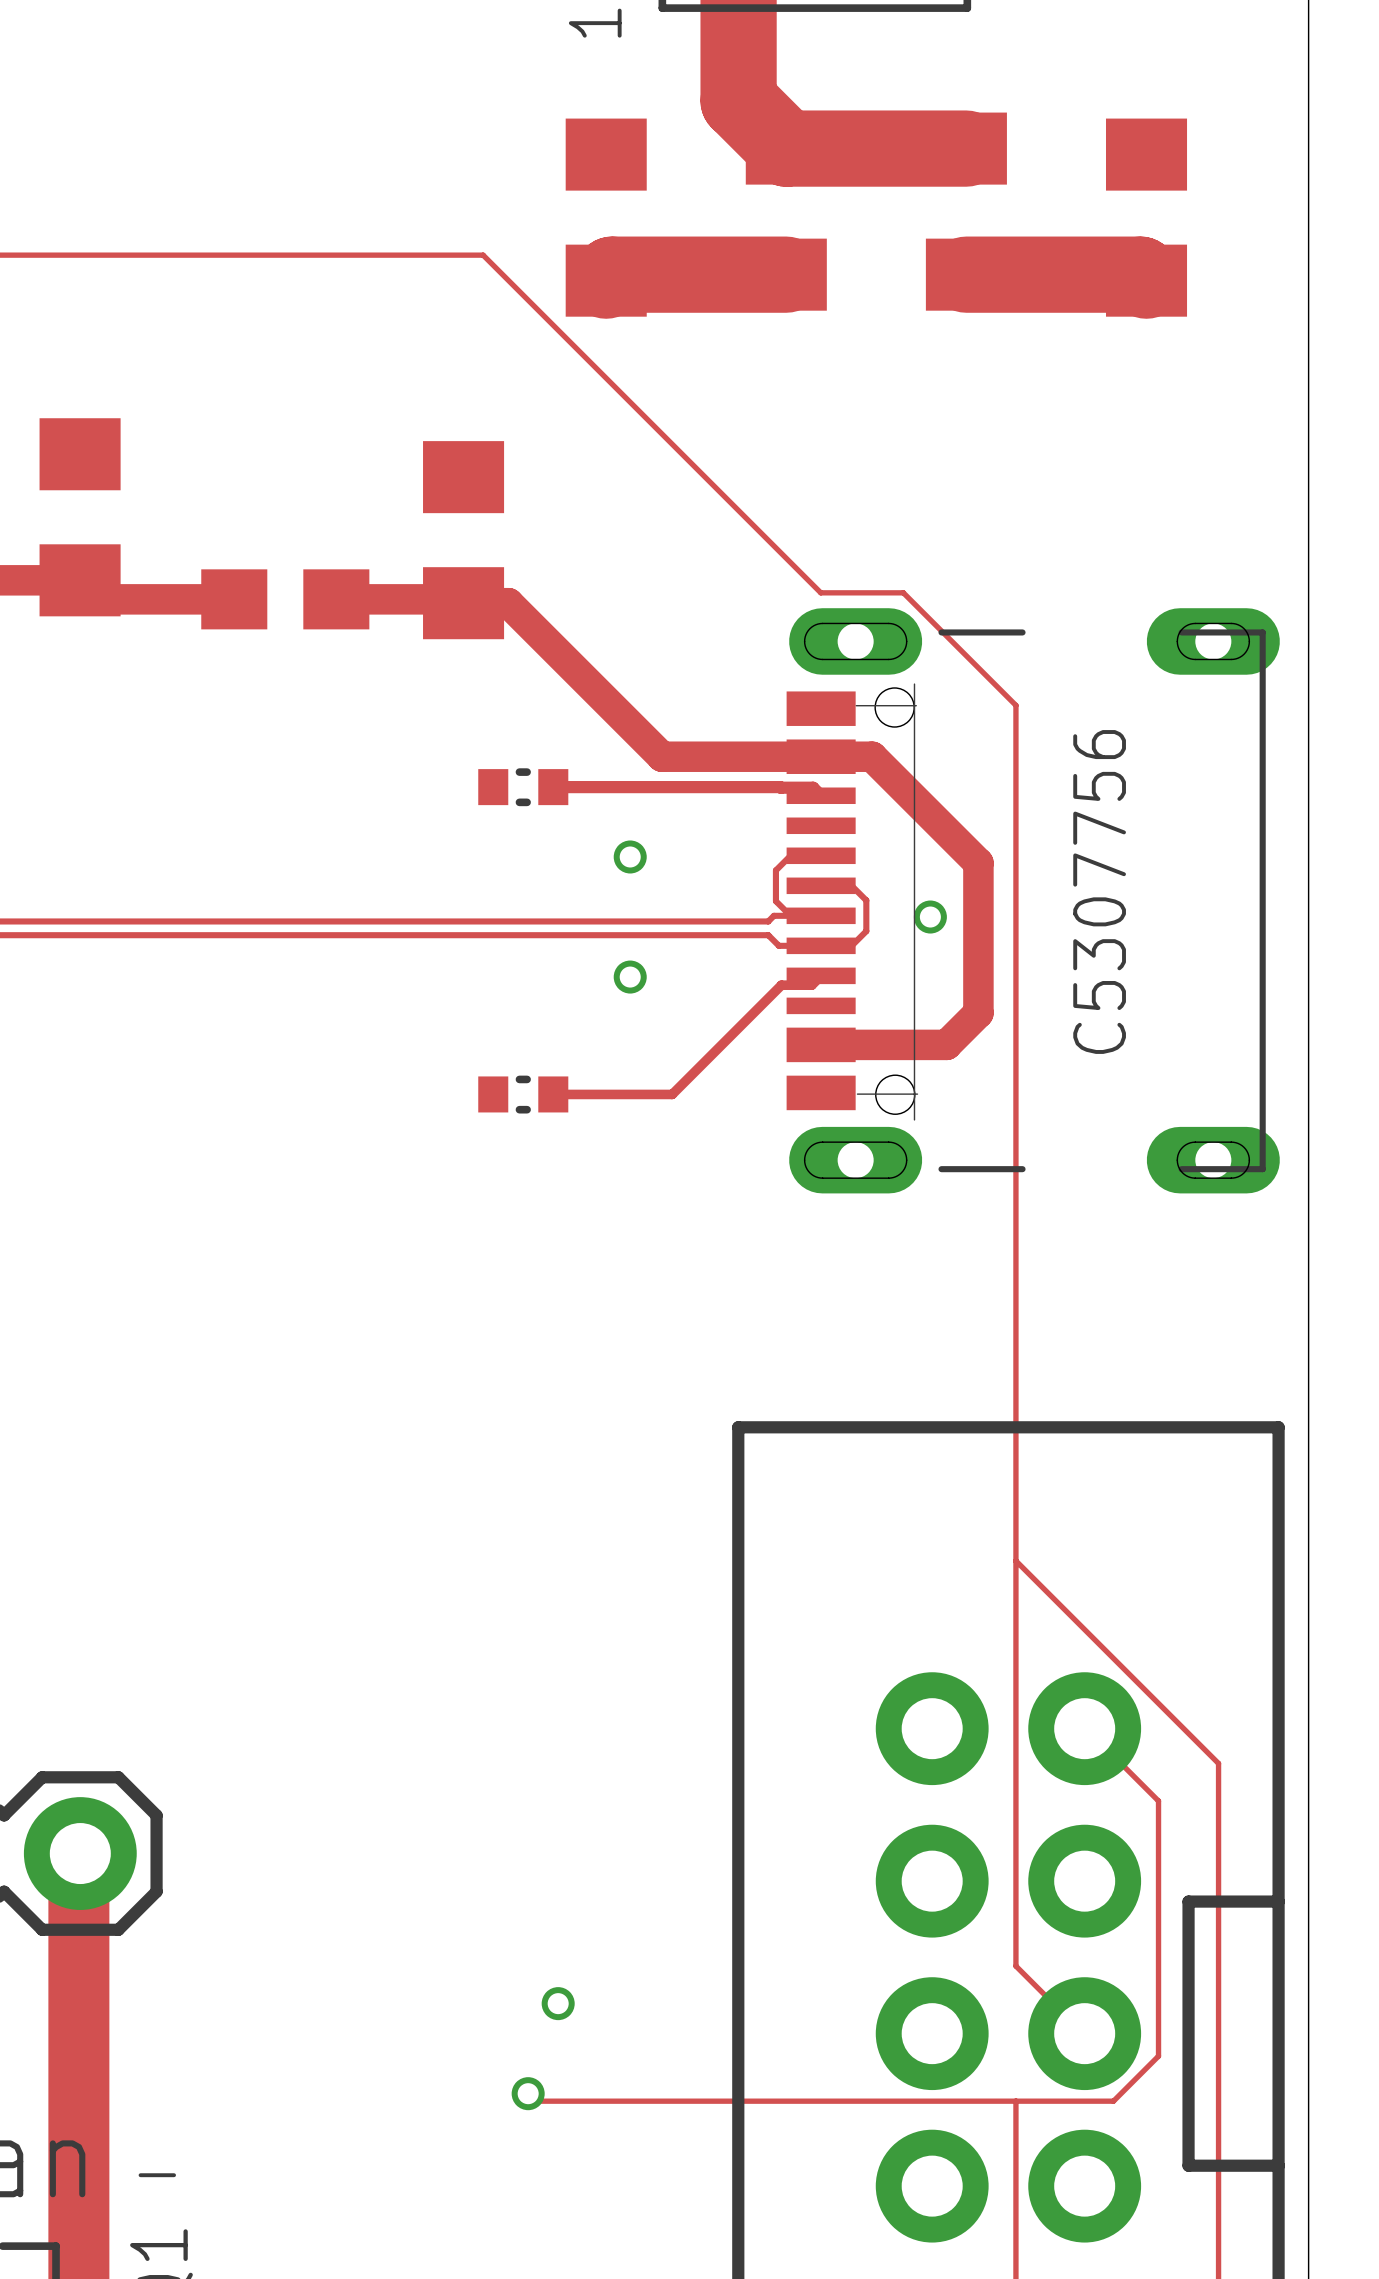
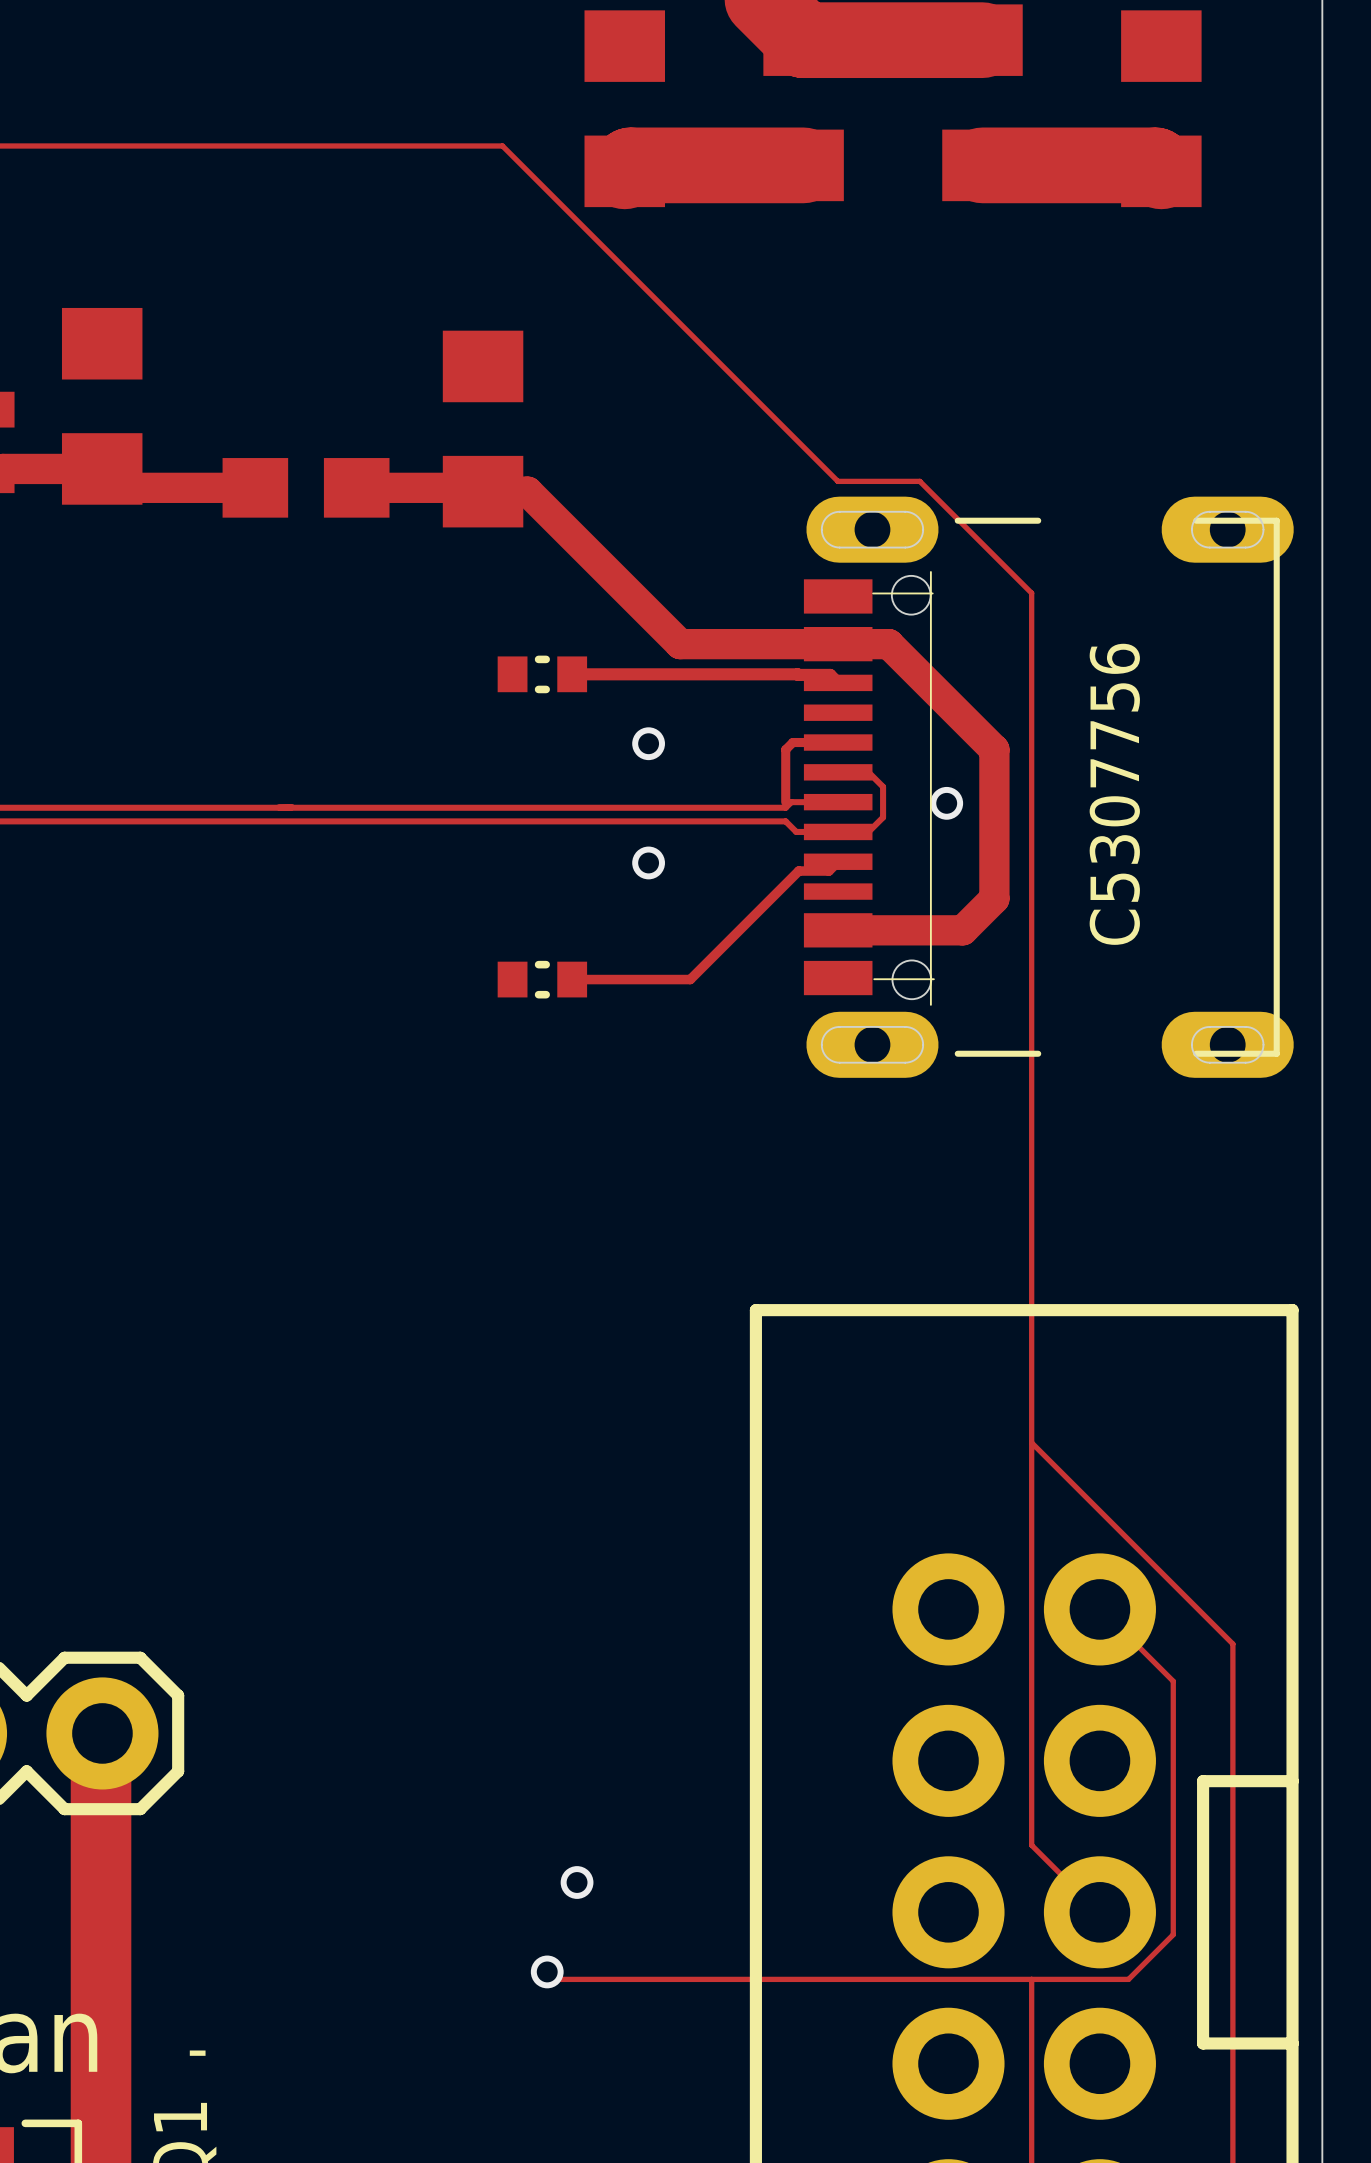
top track: (790, 855) (775, 870) (775, 901) (790, 915) -> (807, 742) (792, 742) (785, 749) (785, 802)

